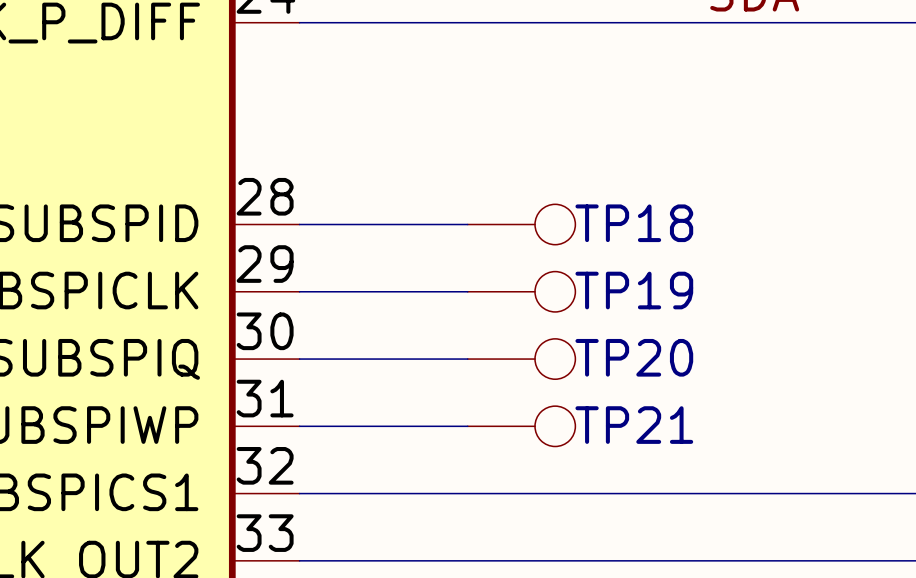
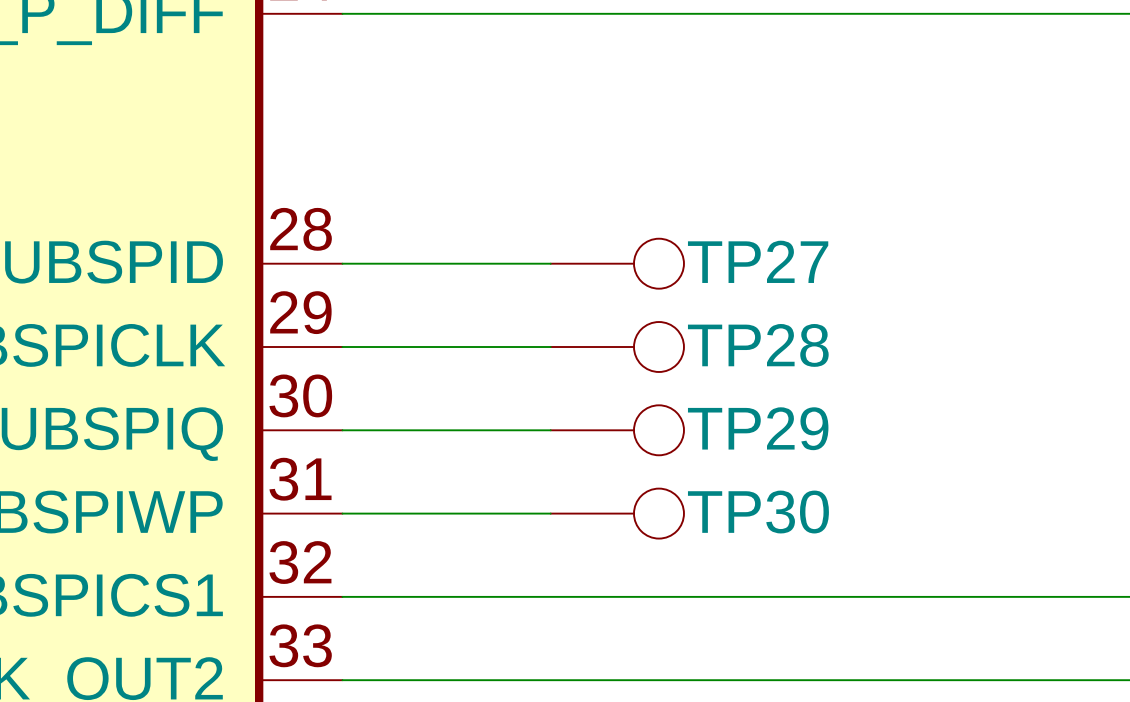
TP18 name: TP18 (634, 223) -> TP27 (758, 261)
TP19 name: TP19 (634, 290) -> TP28 (758, 345)
TP20 name: TP20 (634, 357) -> TP29 (758, 428)
TP21 name: TP21 (634, 425) -> TP30 (758, 512)

